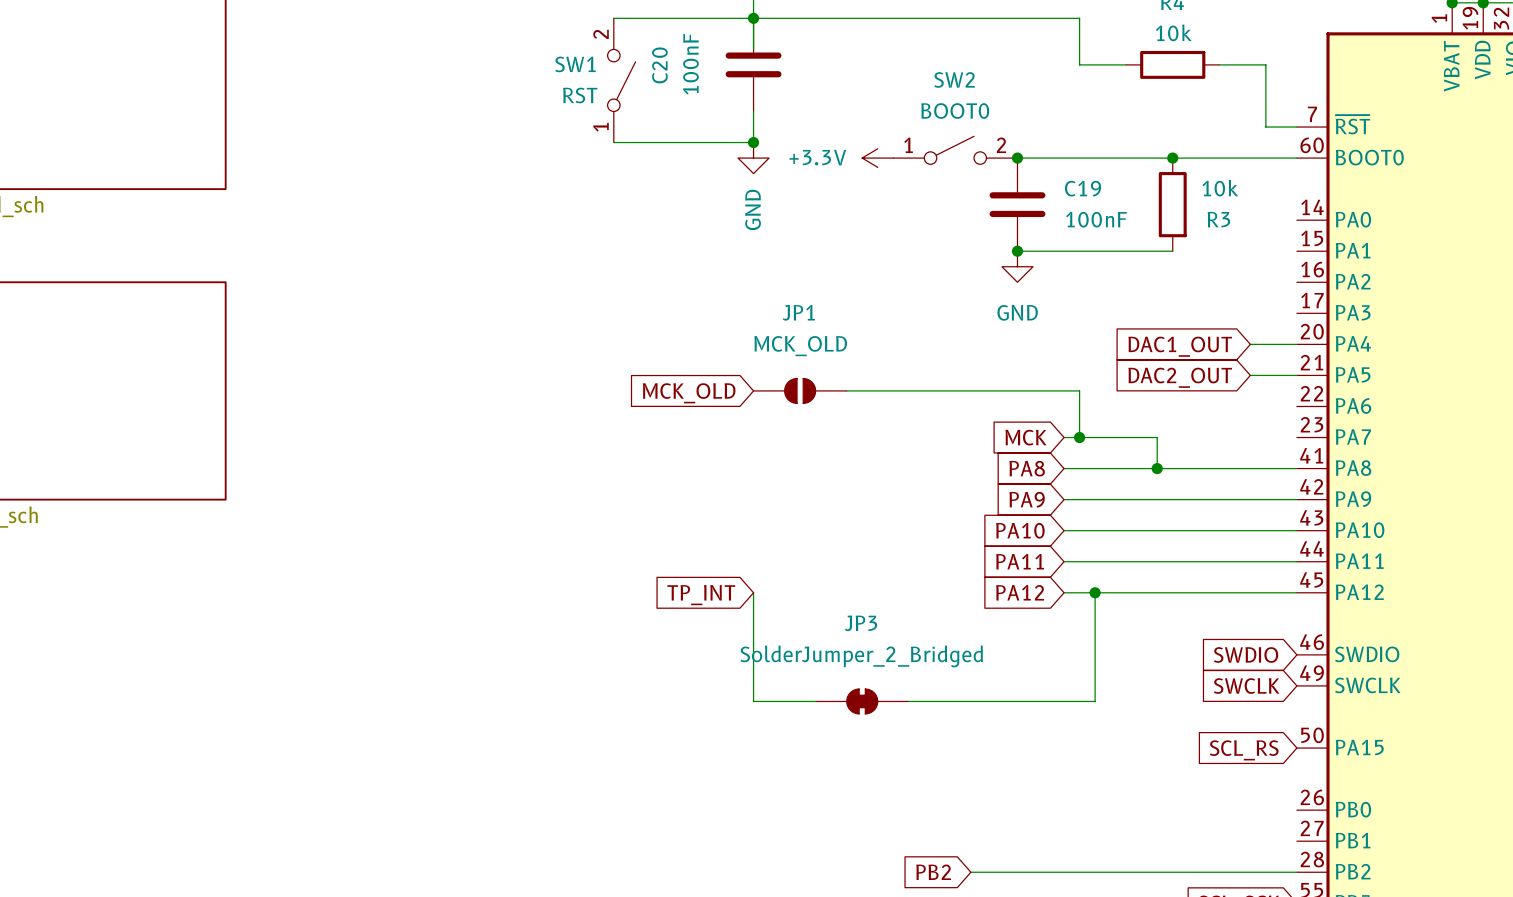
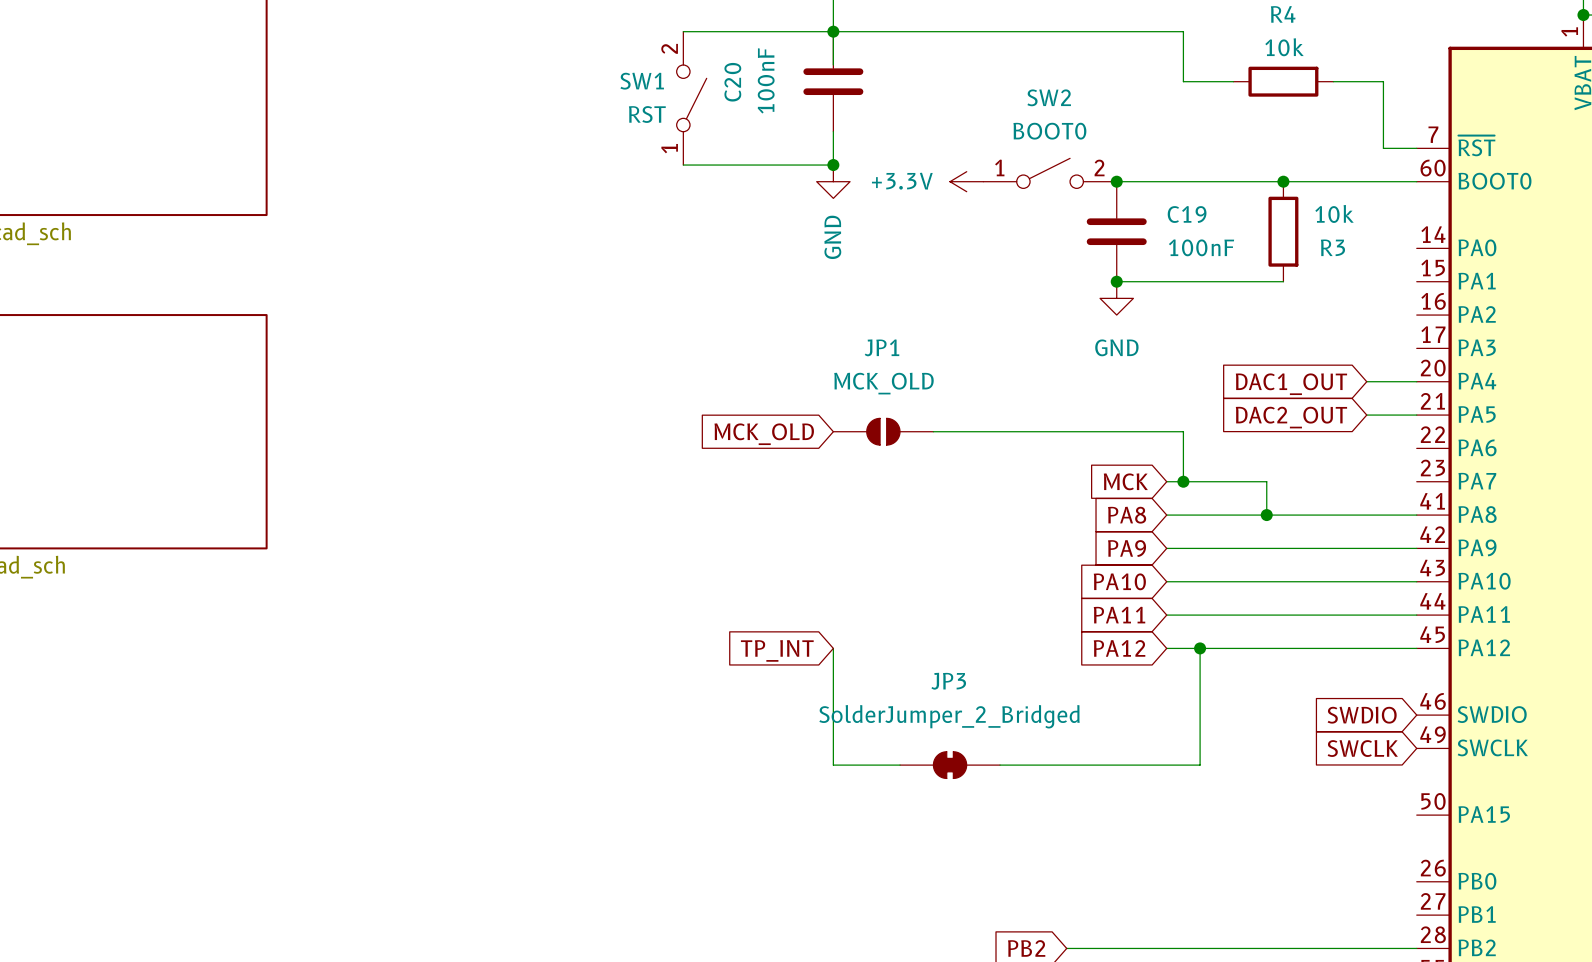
global label: SCL_RS (1244, 750) -> none

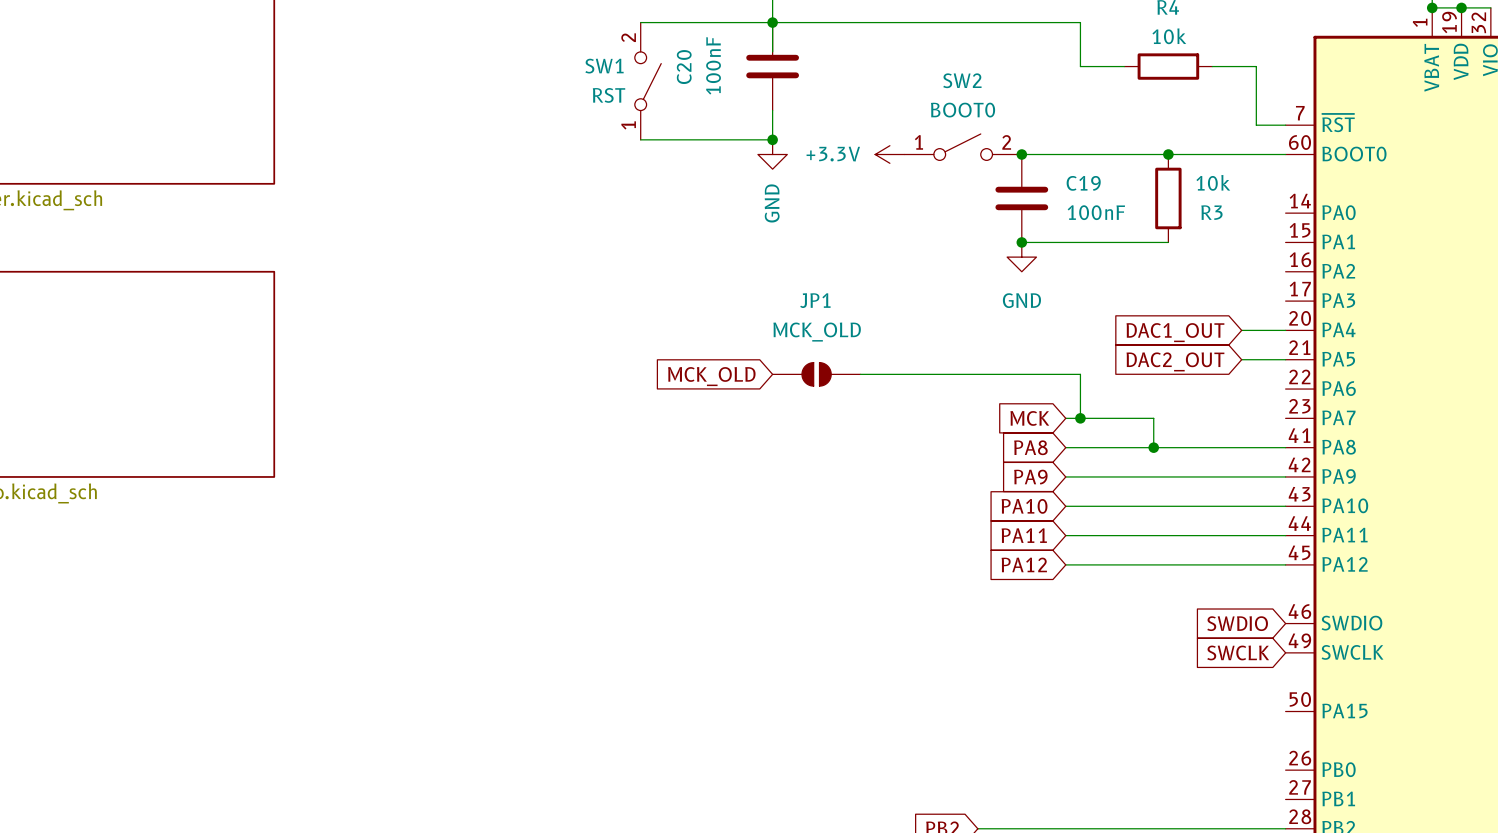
wire: (833, 648) (833, 765) (900, 765) -> none
wire: (1200, 648) (1200, 765) (1000, 765) -> none
junction: (1200, 648) -> none
global label: TP_INT (777, 650) -> none
JP3: SolderJumper_2_Bridged (950, 765) -> none

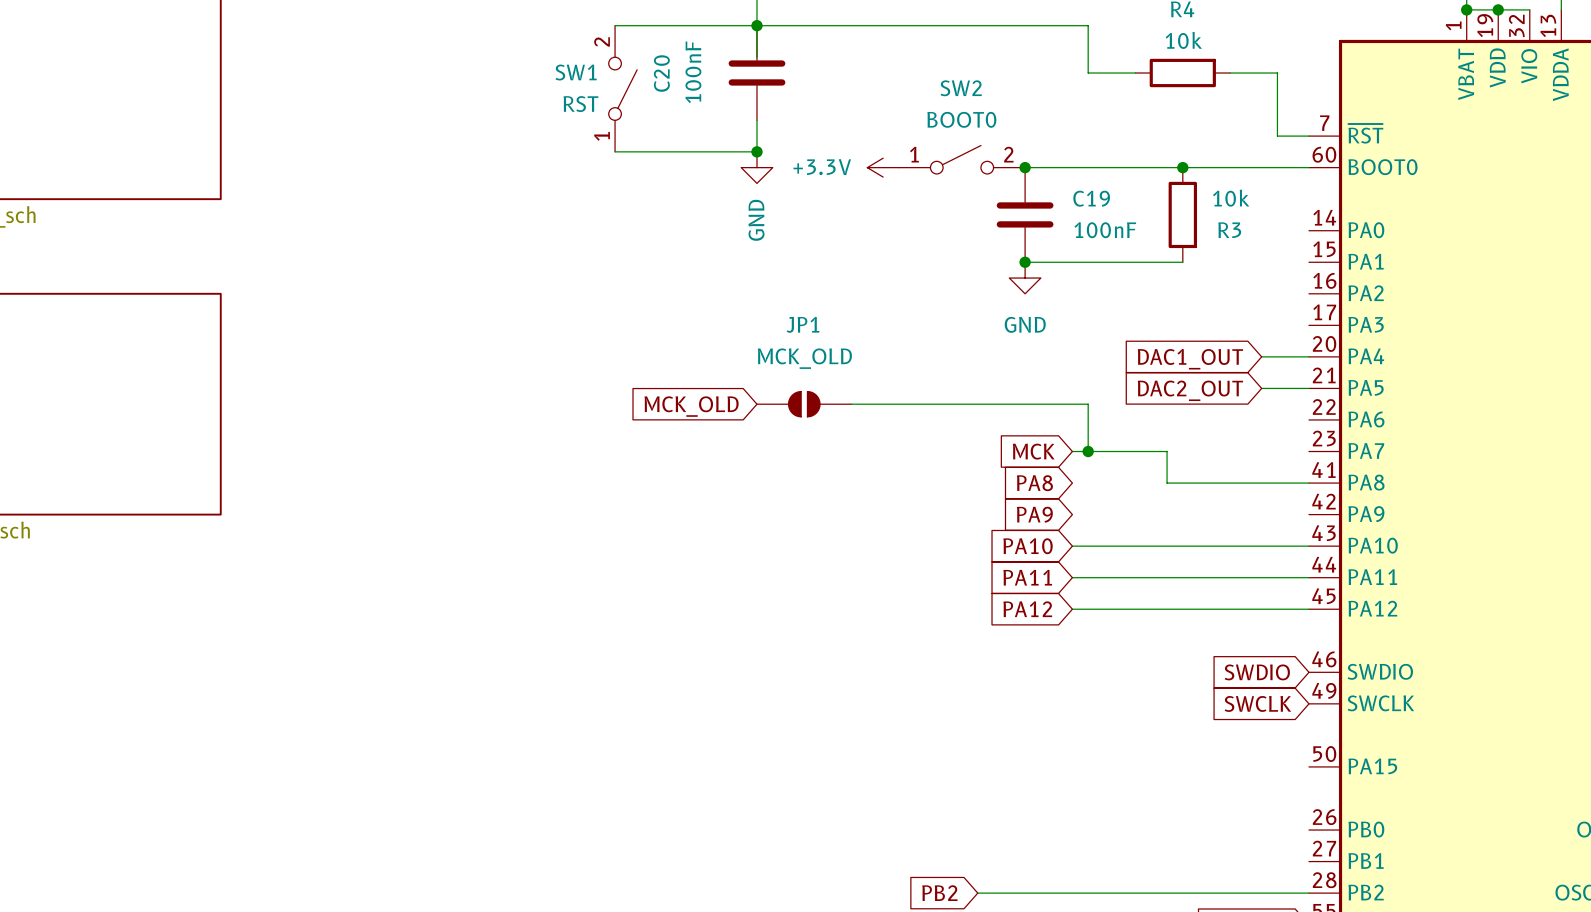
wire: (1065, 447) (1153, 447) -> none
junction: (1153, 447) -> none
wire: (1065, 476) (1285, 476) -> none

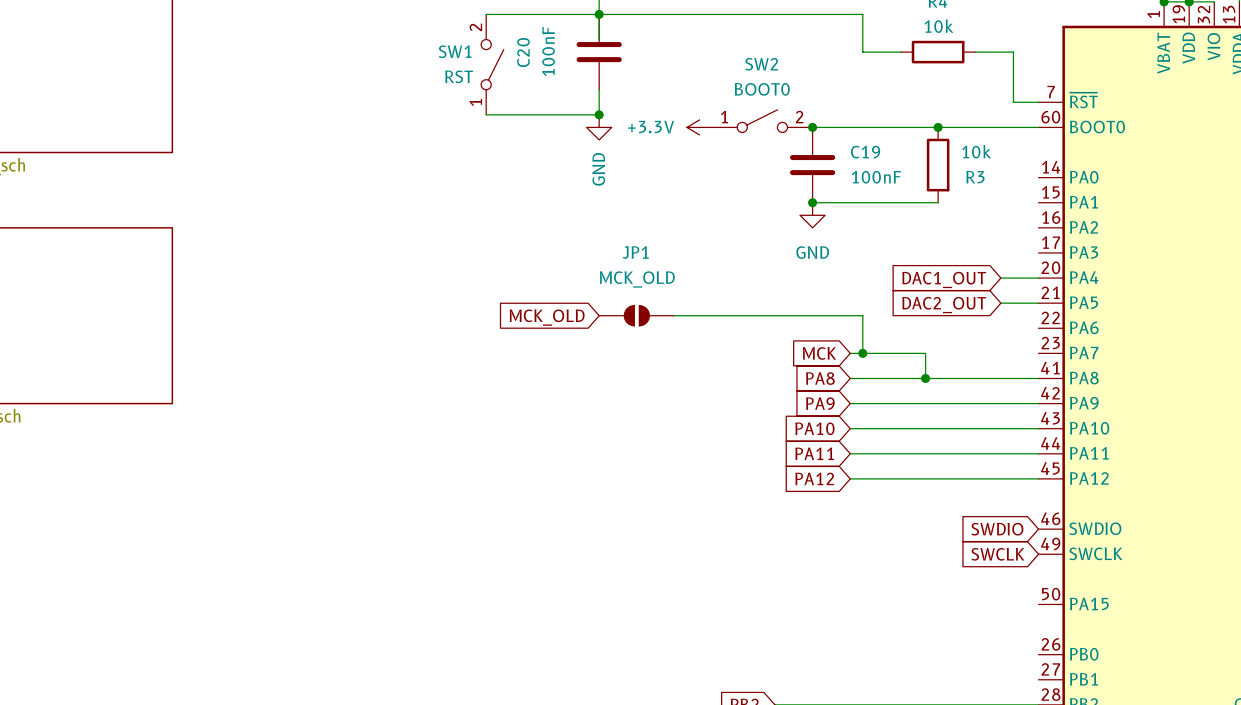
wire: none -> (850, 378) (925, 378)
junction: none -> (925, 378)
wire: none -> (850, 403) (1038, 403)

